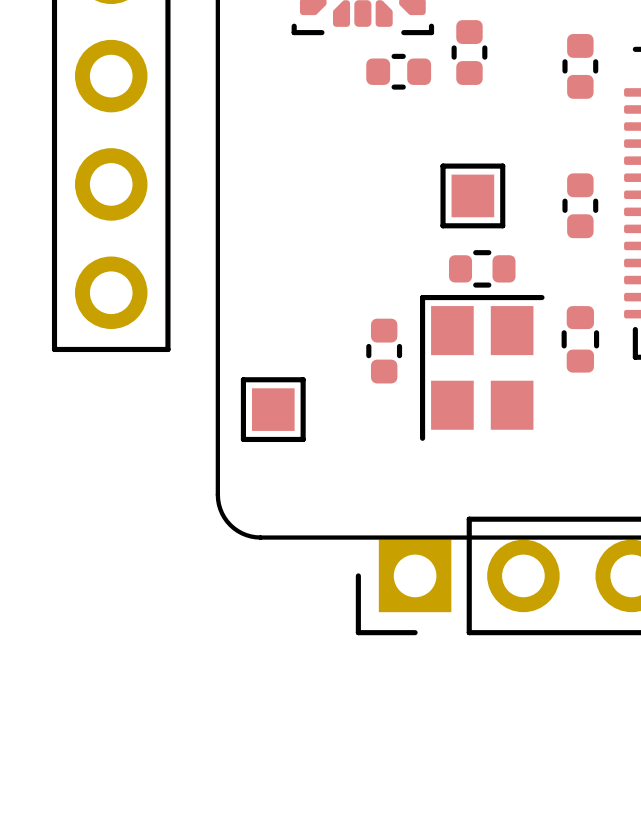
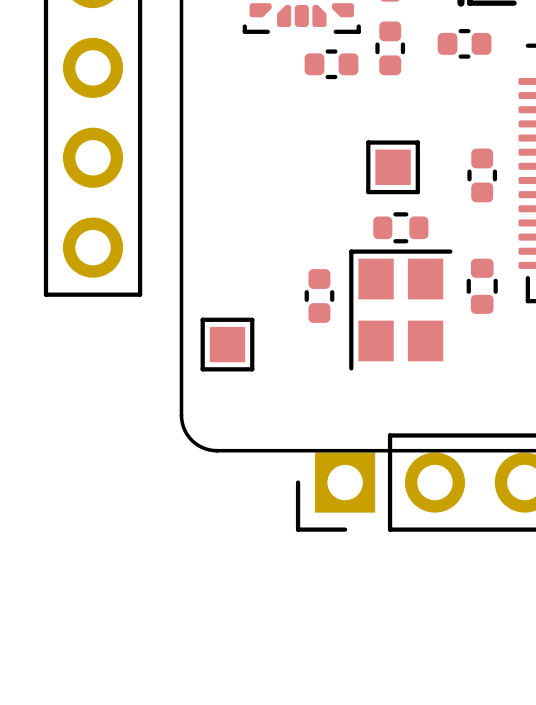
part rotation: 0° (580, 66) -> 90° clockwise (464, 43)

